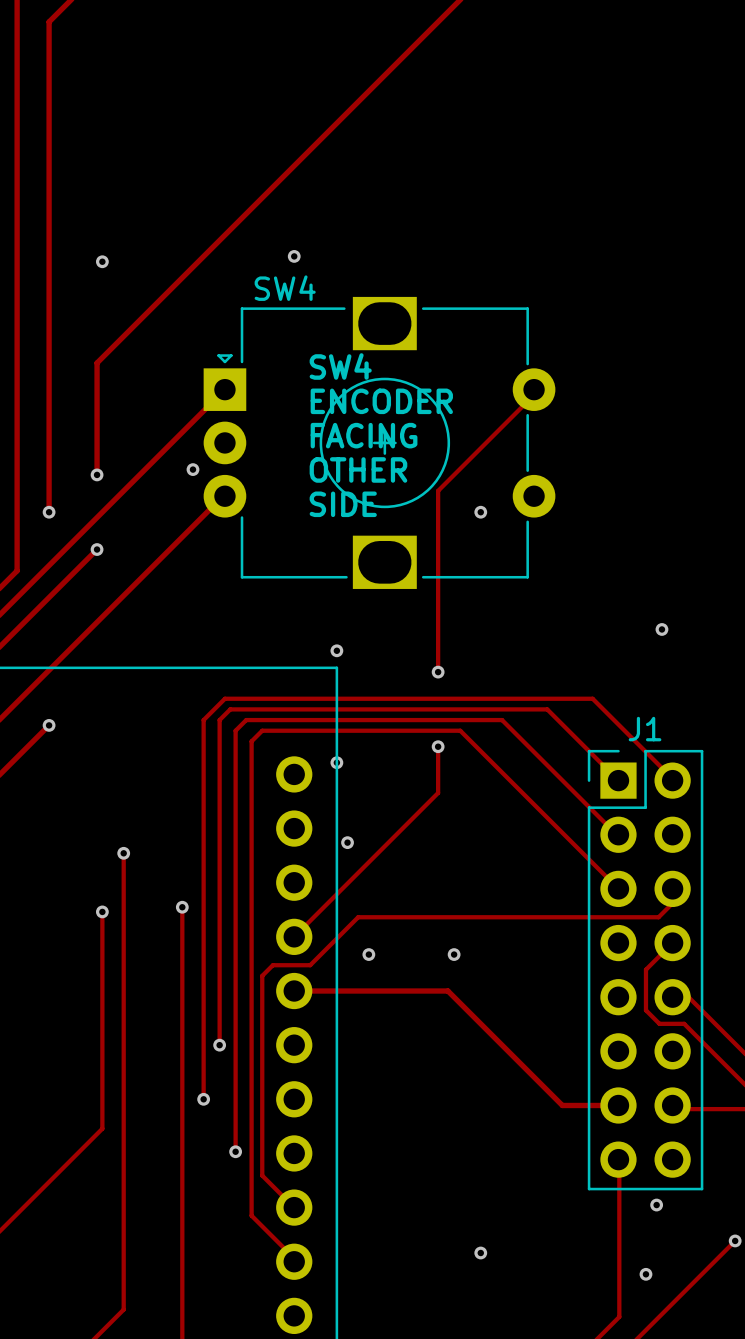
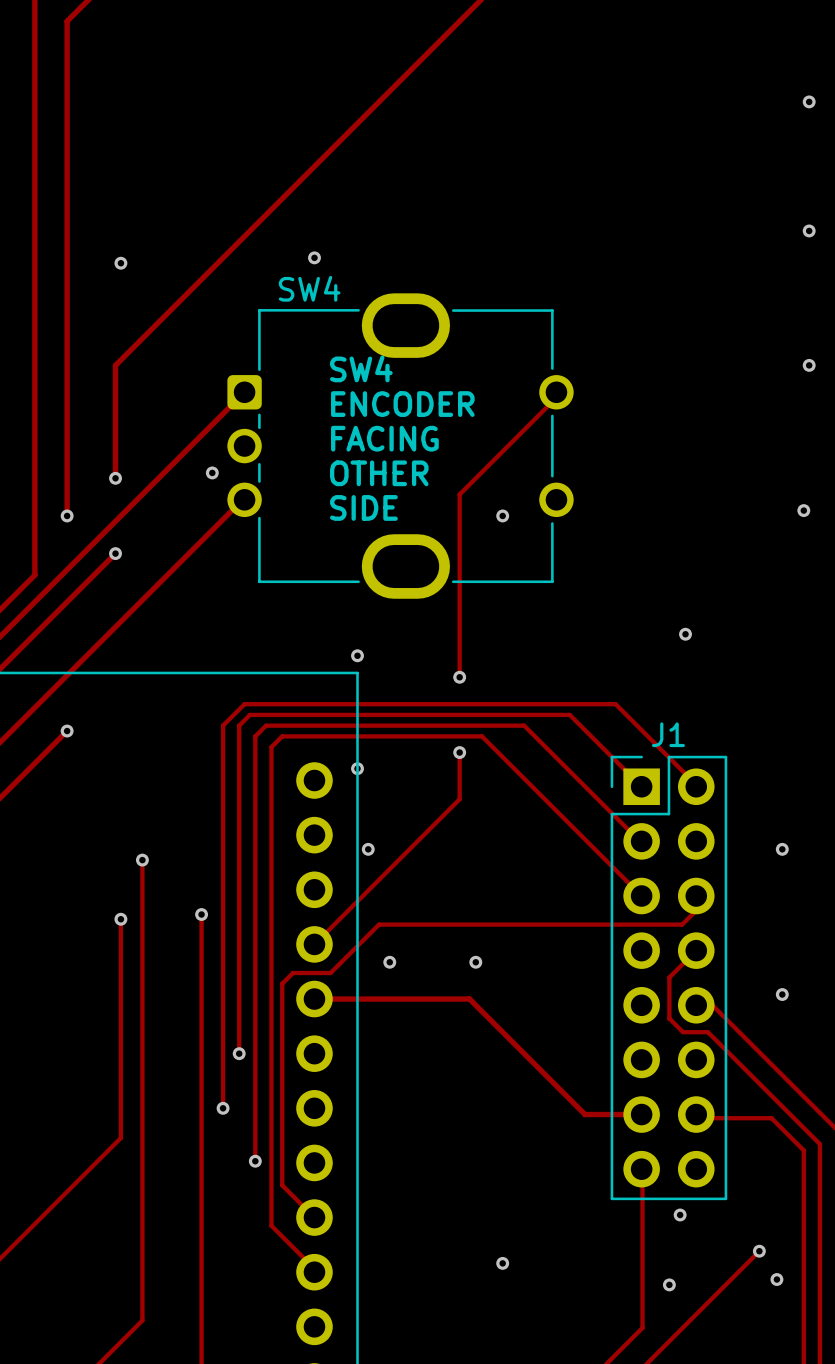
SW4 footprint: [203, 296, 556, 589] -> [227, 293, 574, 599]

